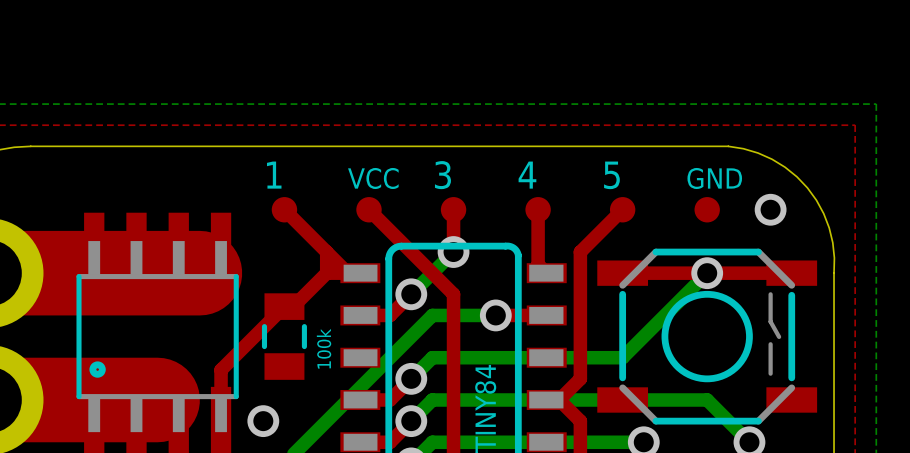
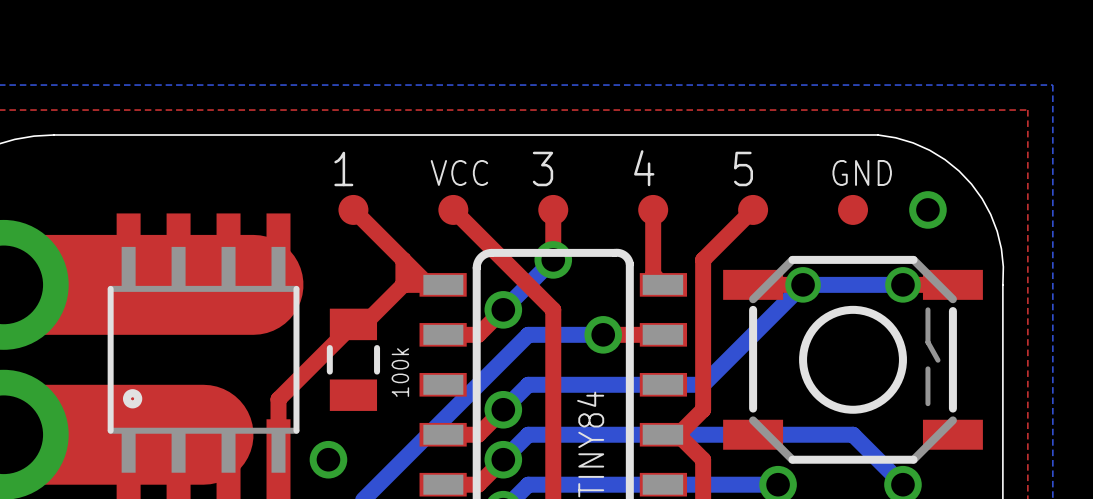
top track: (664, 273) (749, 273) -> none
via: none -> (803, 284)
bottom track: (707, 273) (622, 357) (580, 357) -> (902, 284) (803, 284) (703, 384)
via: (707, 273) -> none
via: none -> (902, 284)

